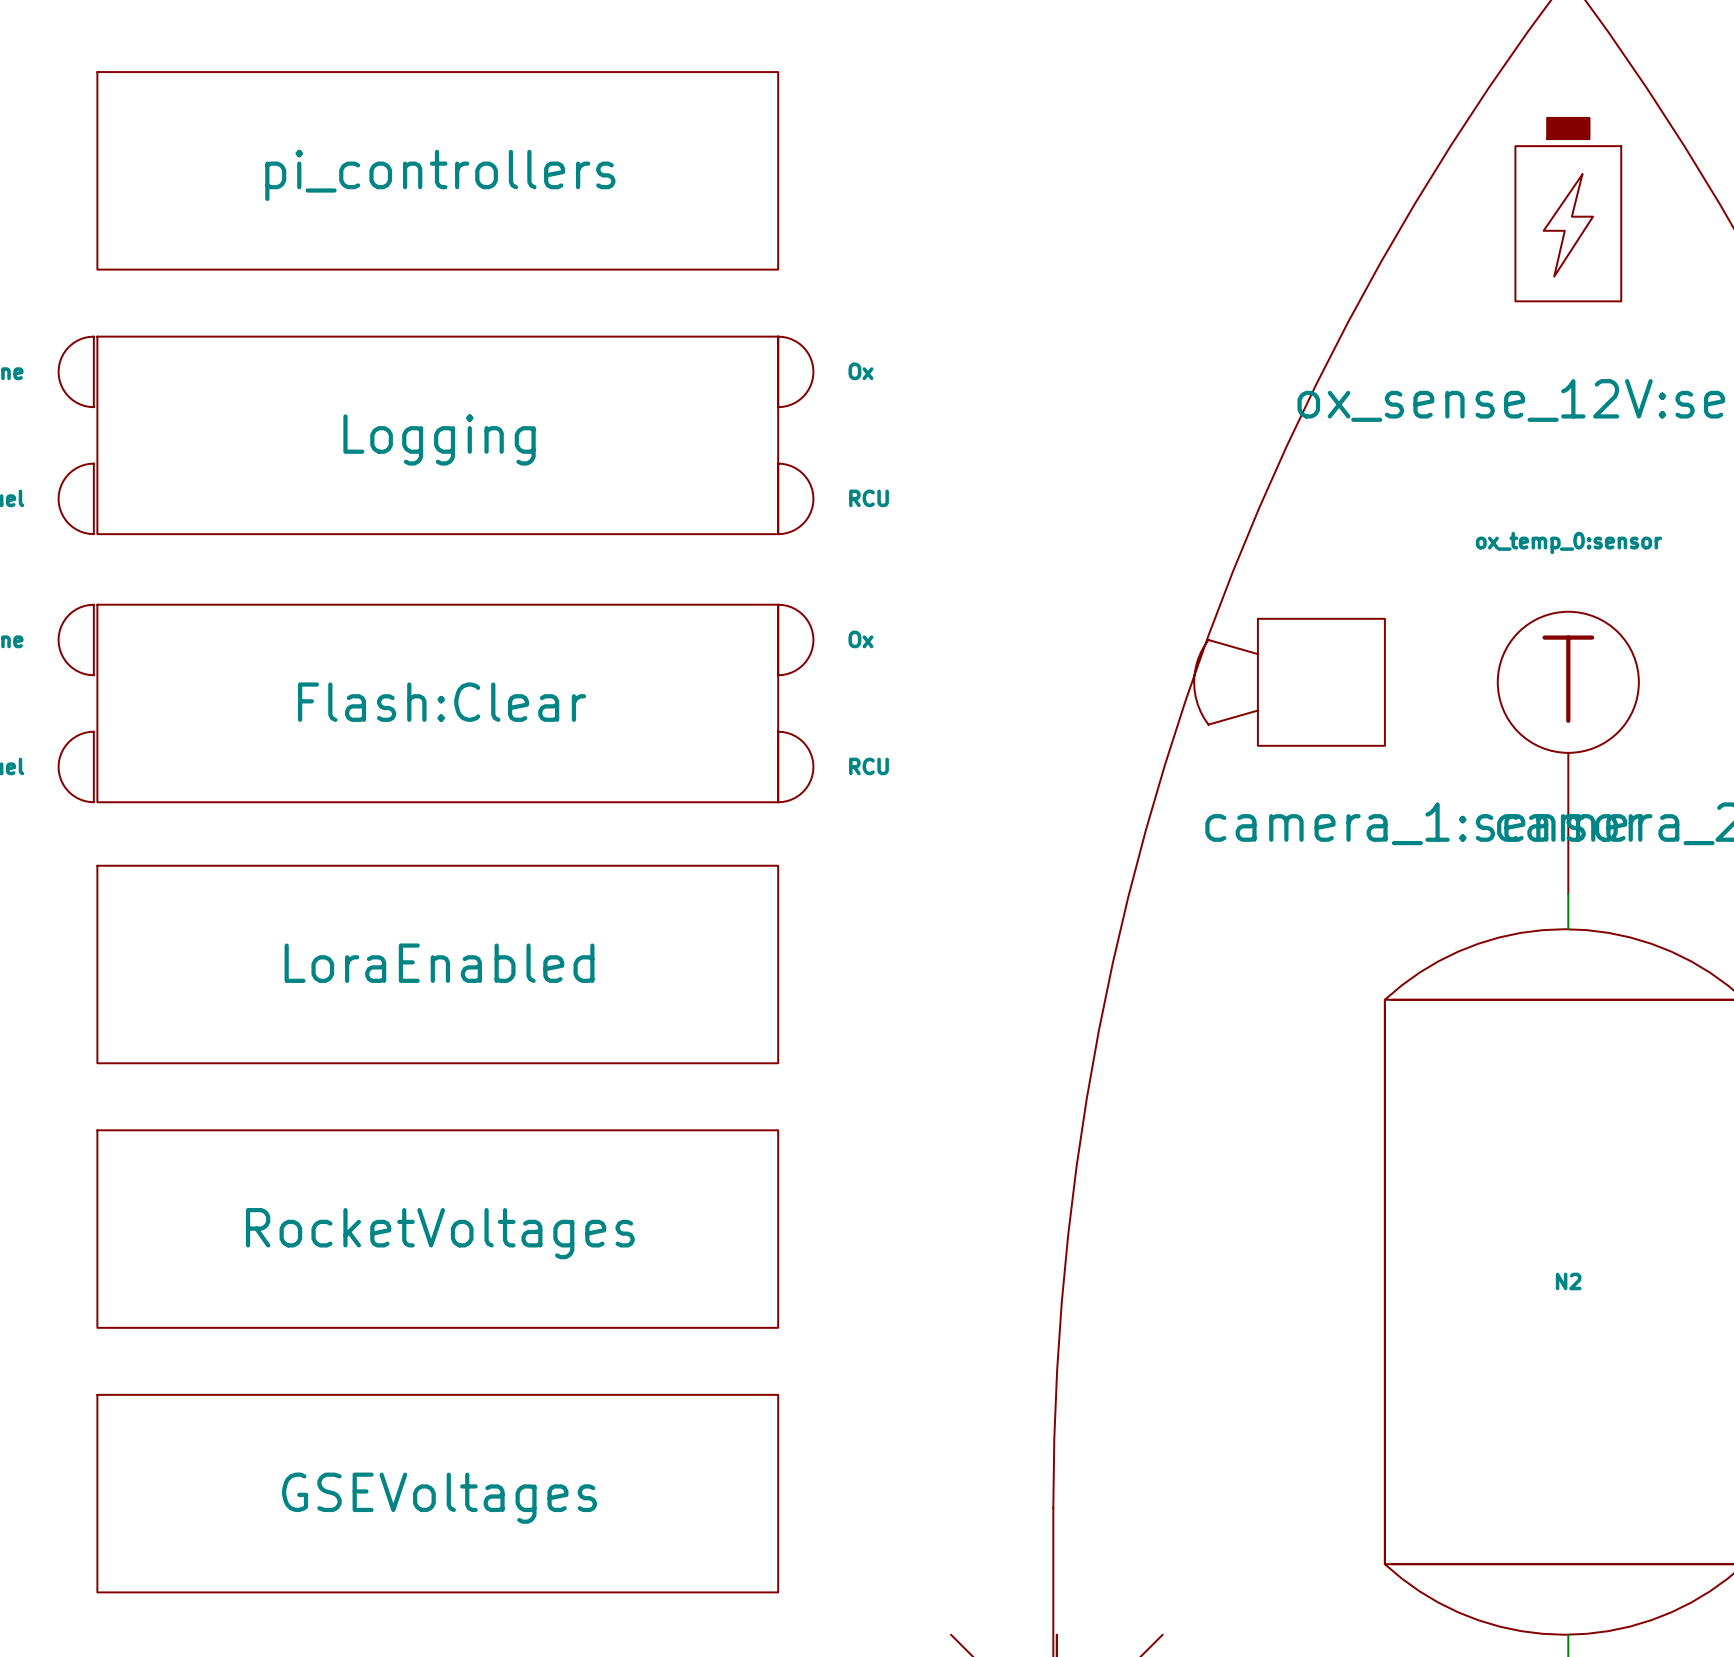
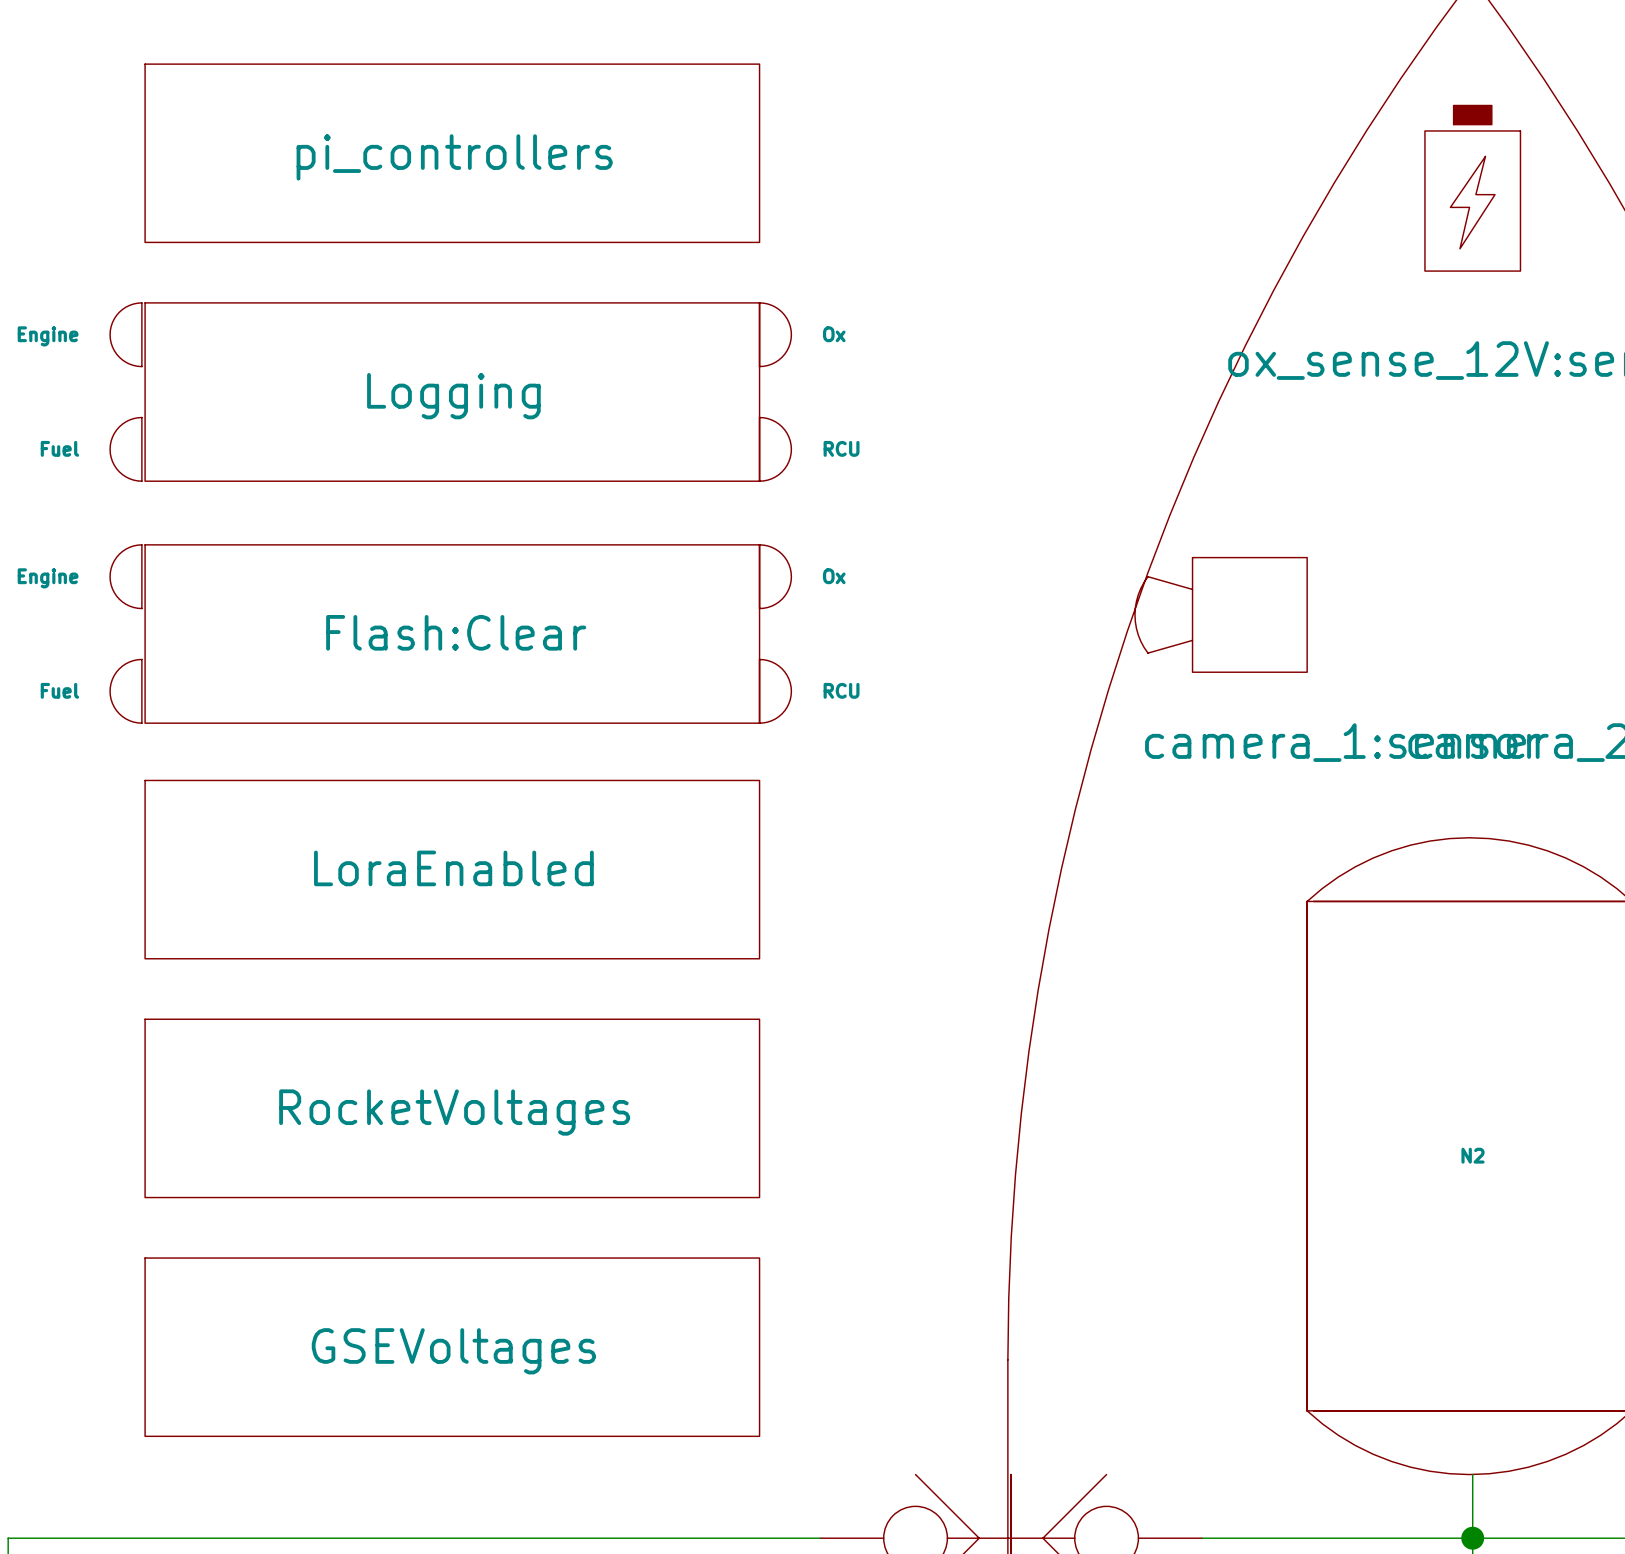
part: ox_temp_0:sensor (1568, 752) -> none
wire: (1568, 893) (1568, 929) -> none

